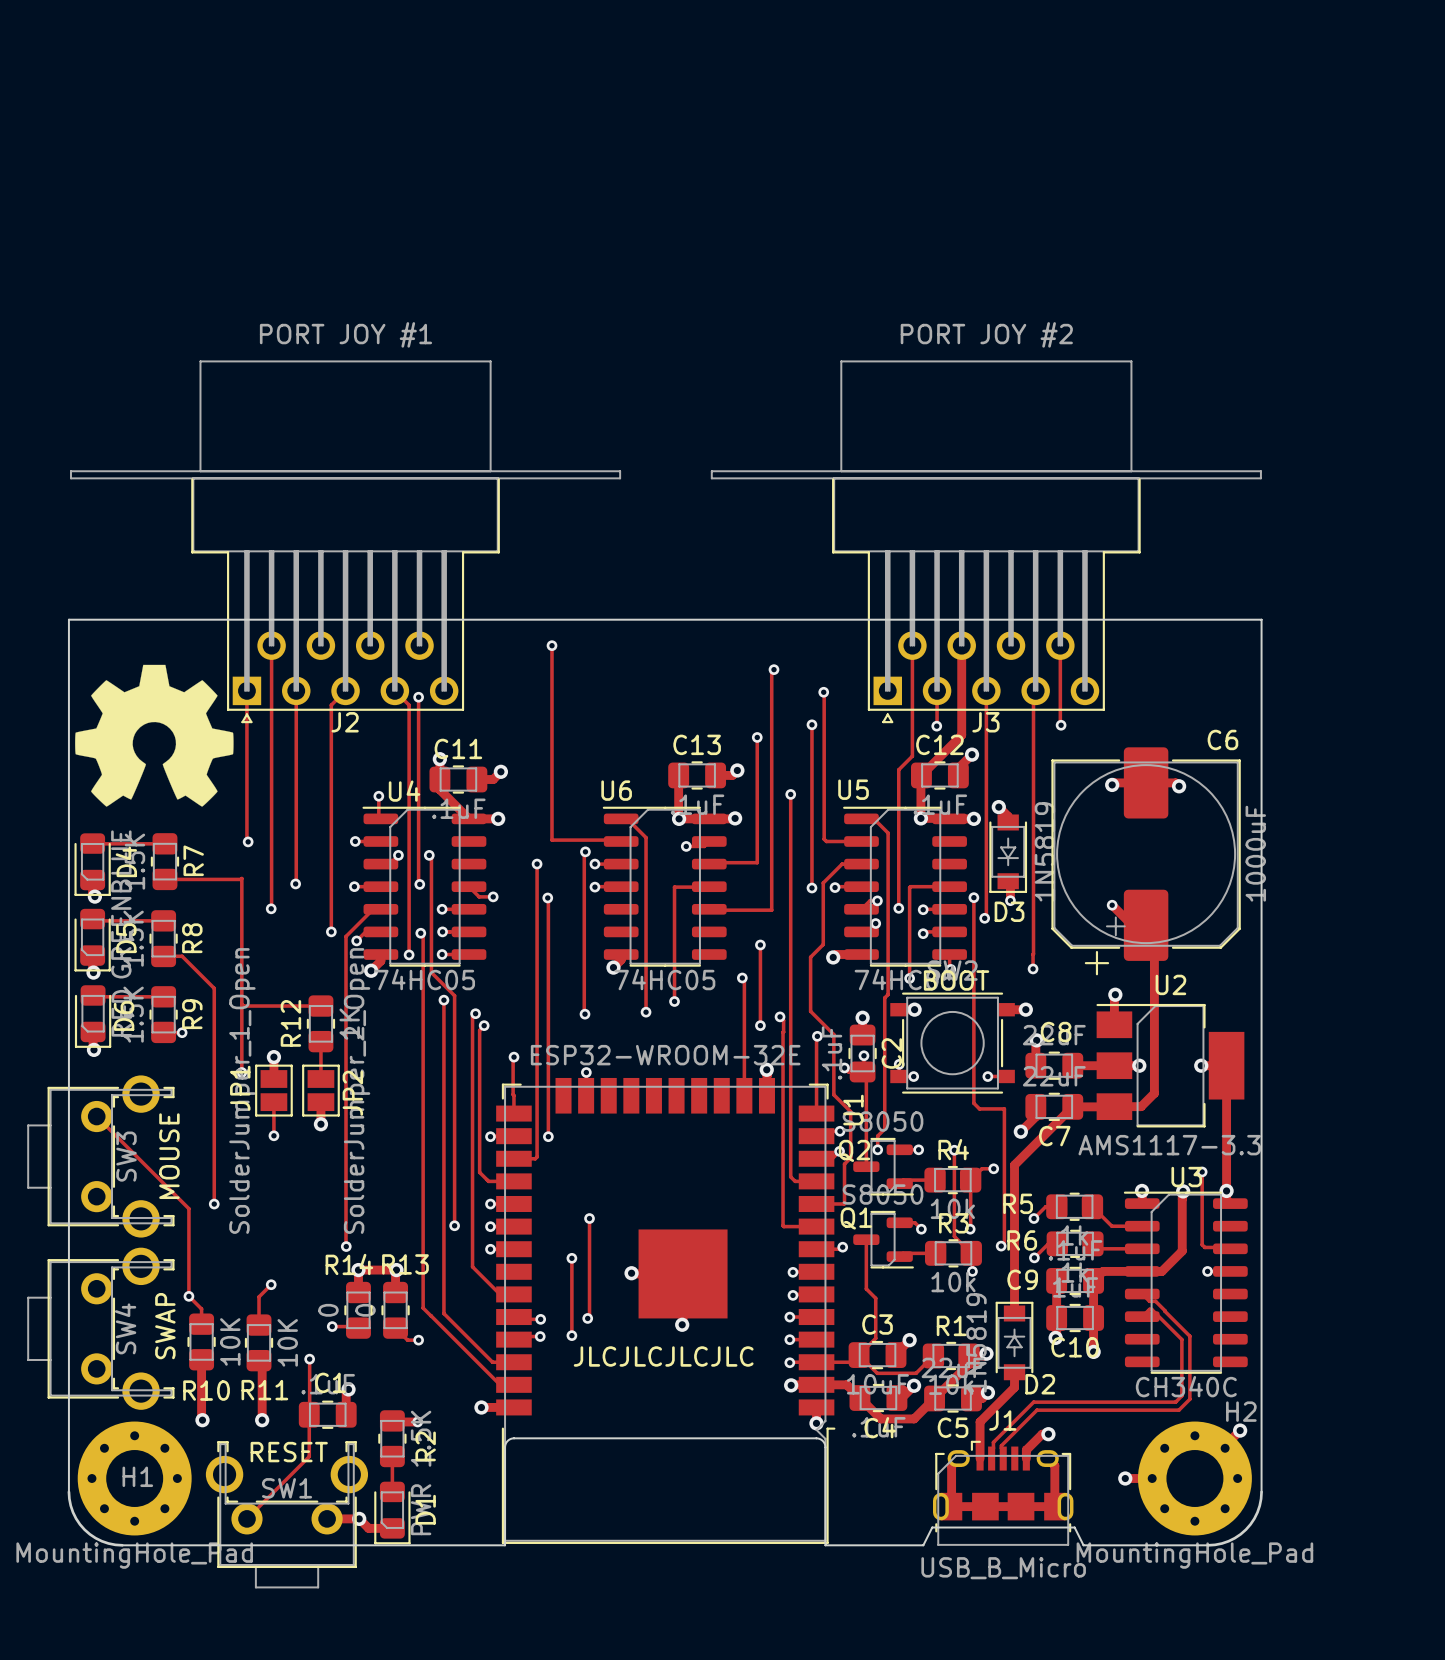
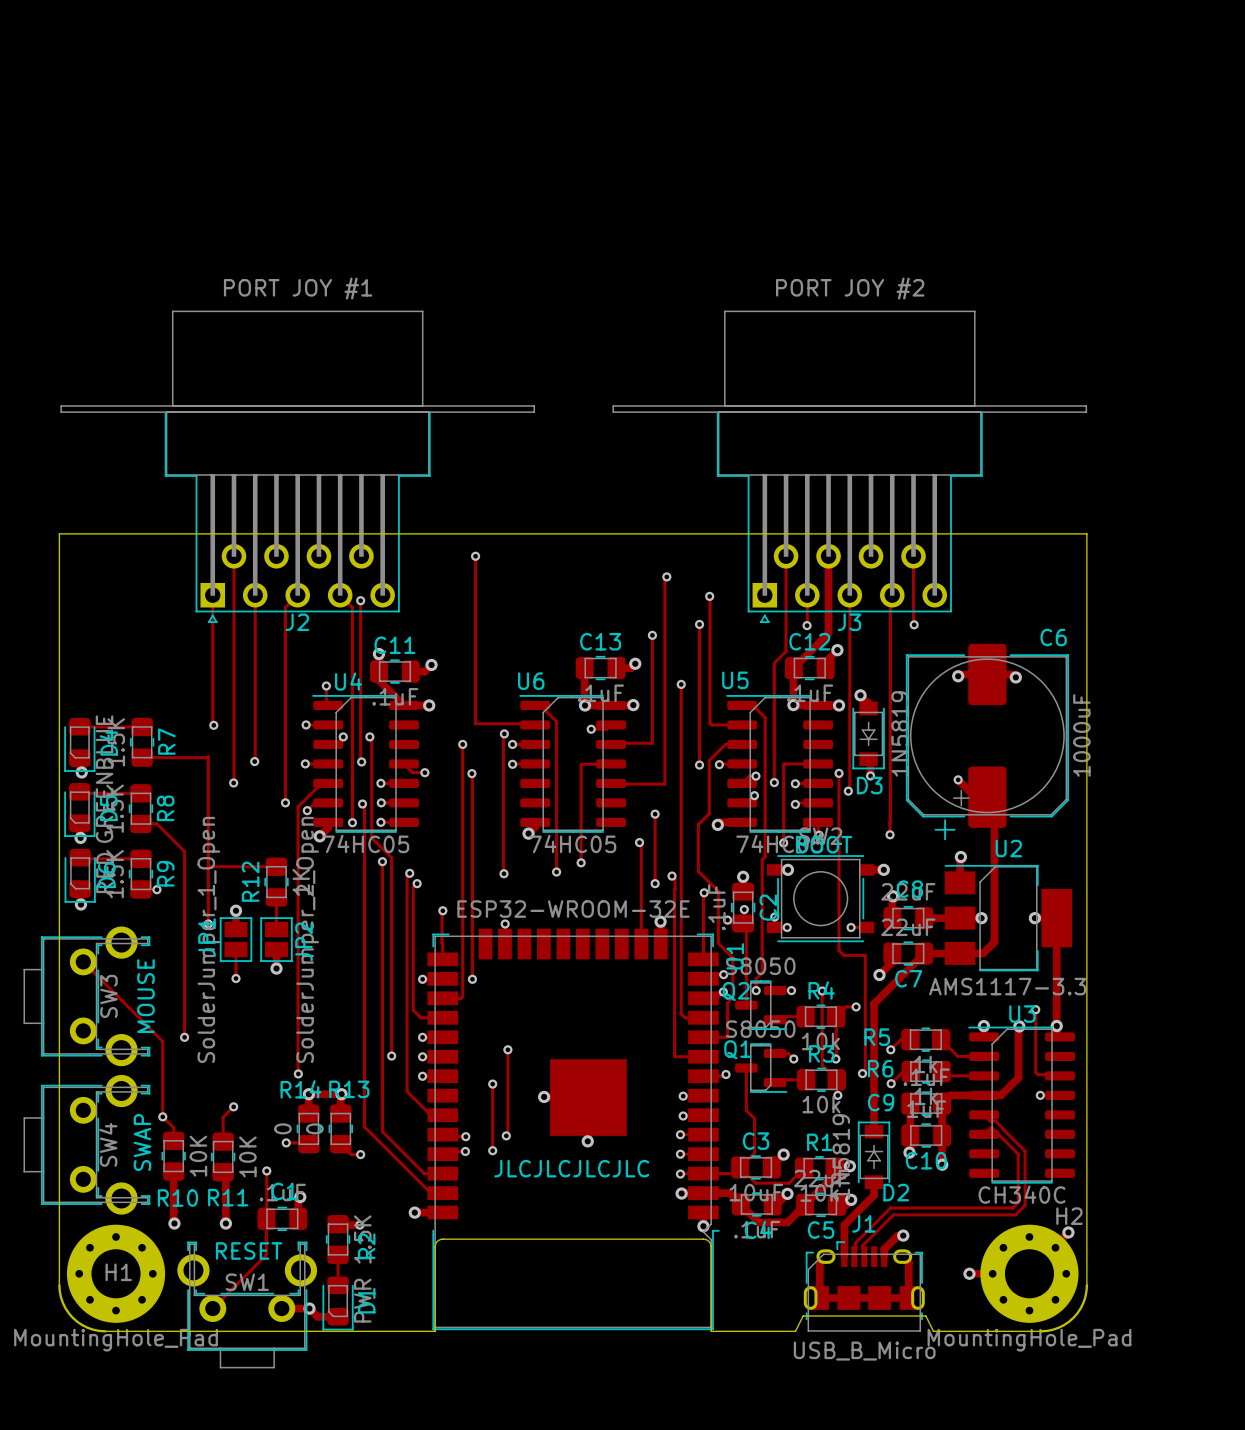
drawing: [75, 664, 234, 807] -> none

